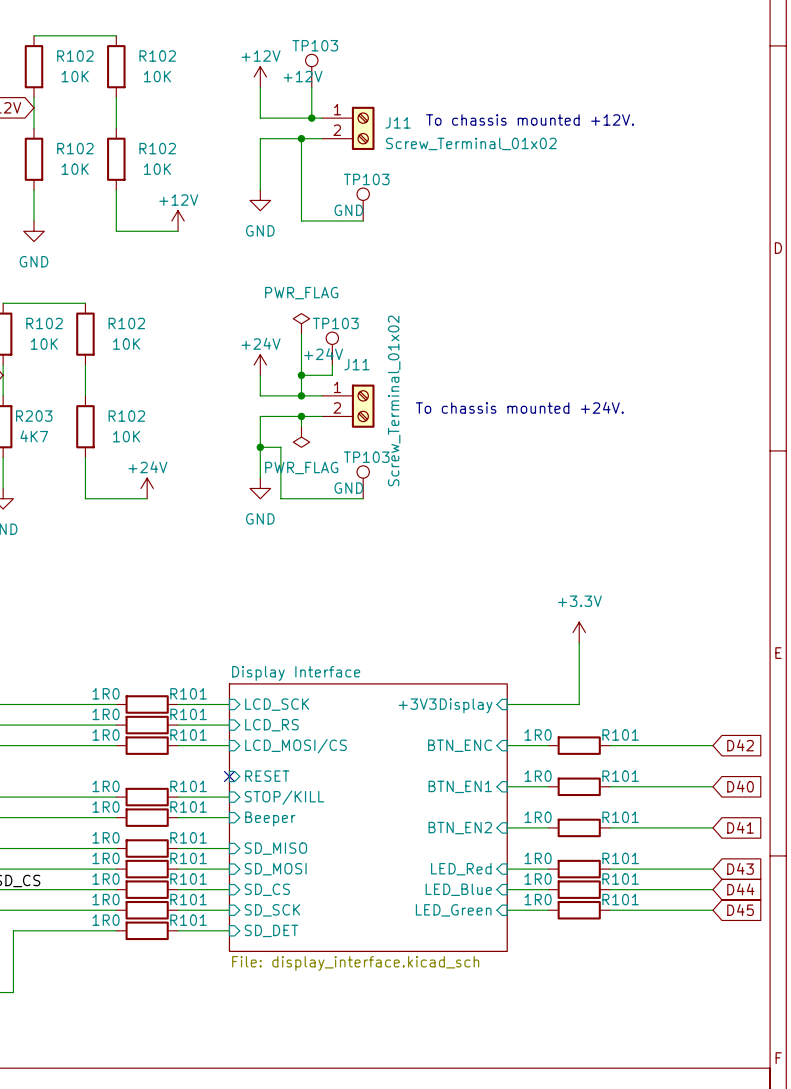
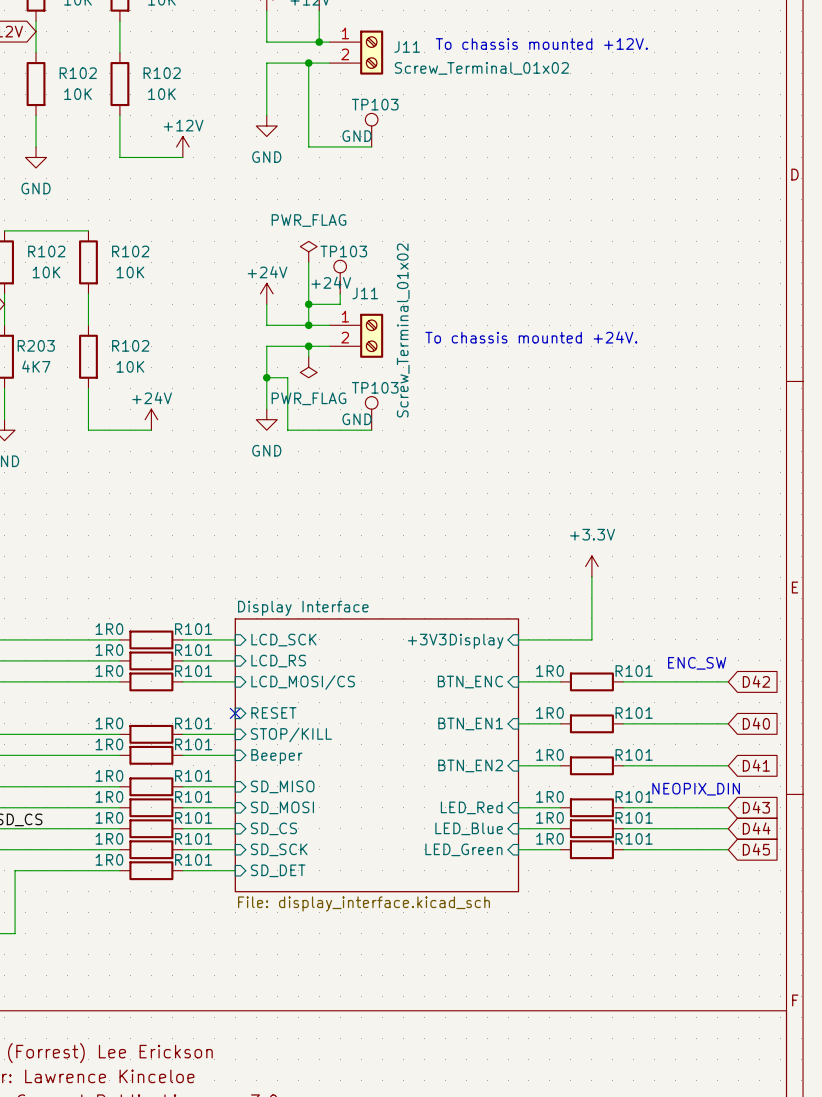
text: none -> ENC_SW (697, 663)
text: none -> NEOPIX_DIN (696, 789)

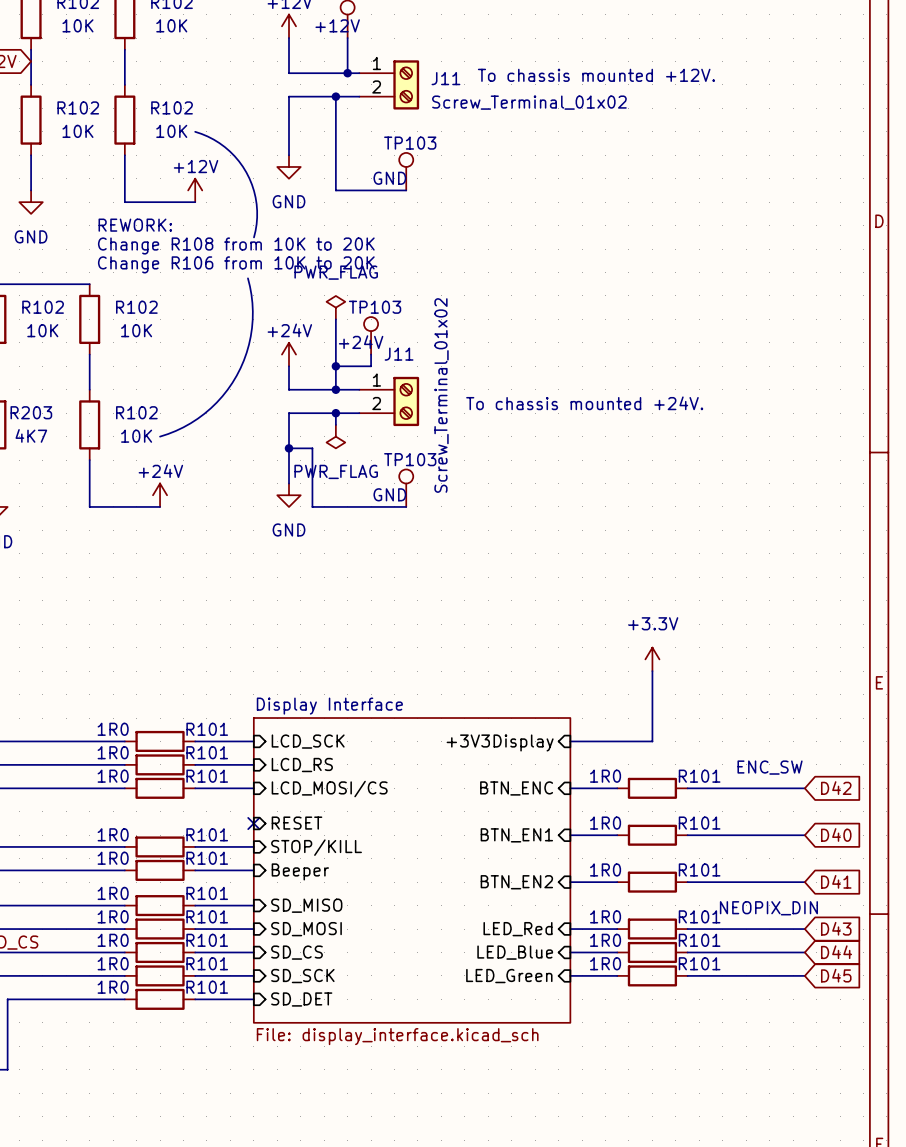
line: none -> (195, 131) (213, 139) (224, 147) (234, 156) (246, 172) (254, 191) (256, 204) (256, 224) (253, 237)
text: none -> REWORK: (135, 225)
text: none -> Change R108 from 10K to 20K (236, 245)
text: none -> Change R106 from 10K to 20K (236, 264)
line: none -> (247, 278) (252, 303) (252, 328) (246, 352) (236, 375) (222, 396) (204, 413) (183, 427) (160, 436)

